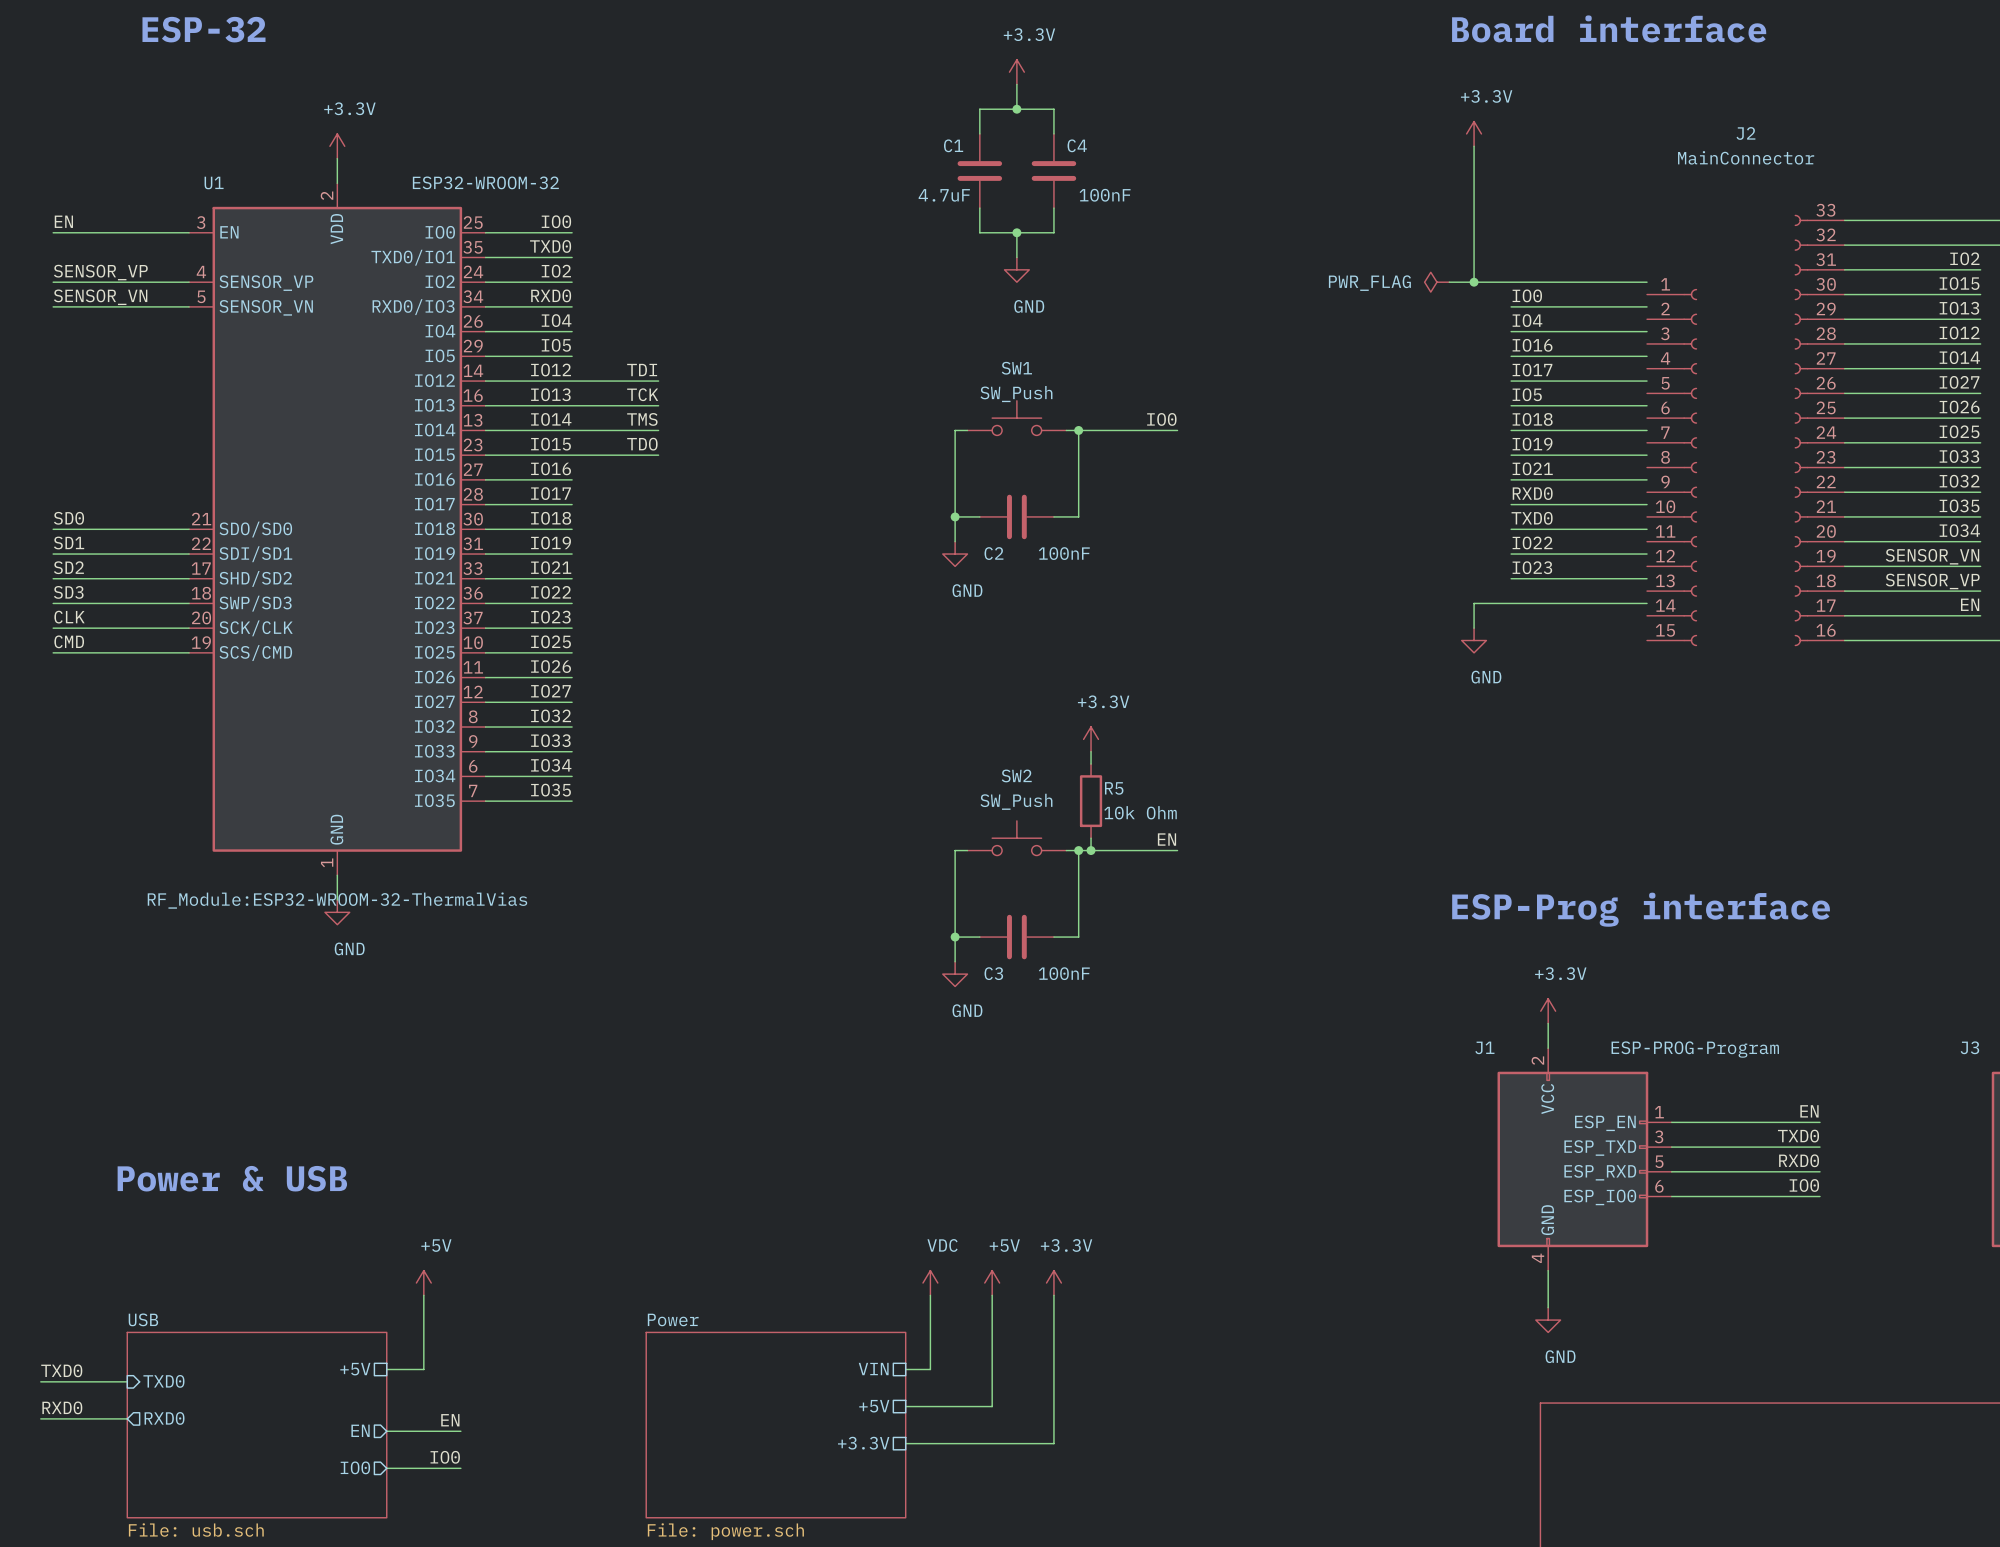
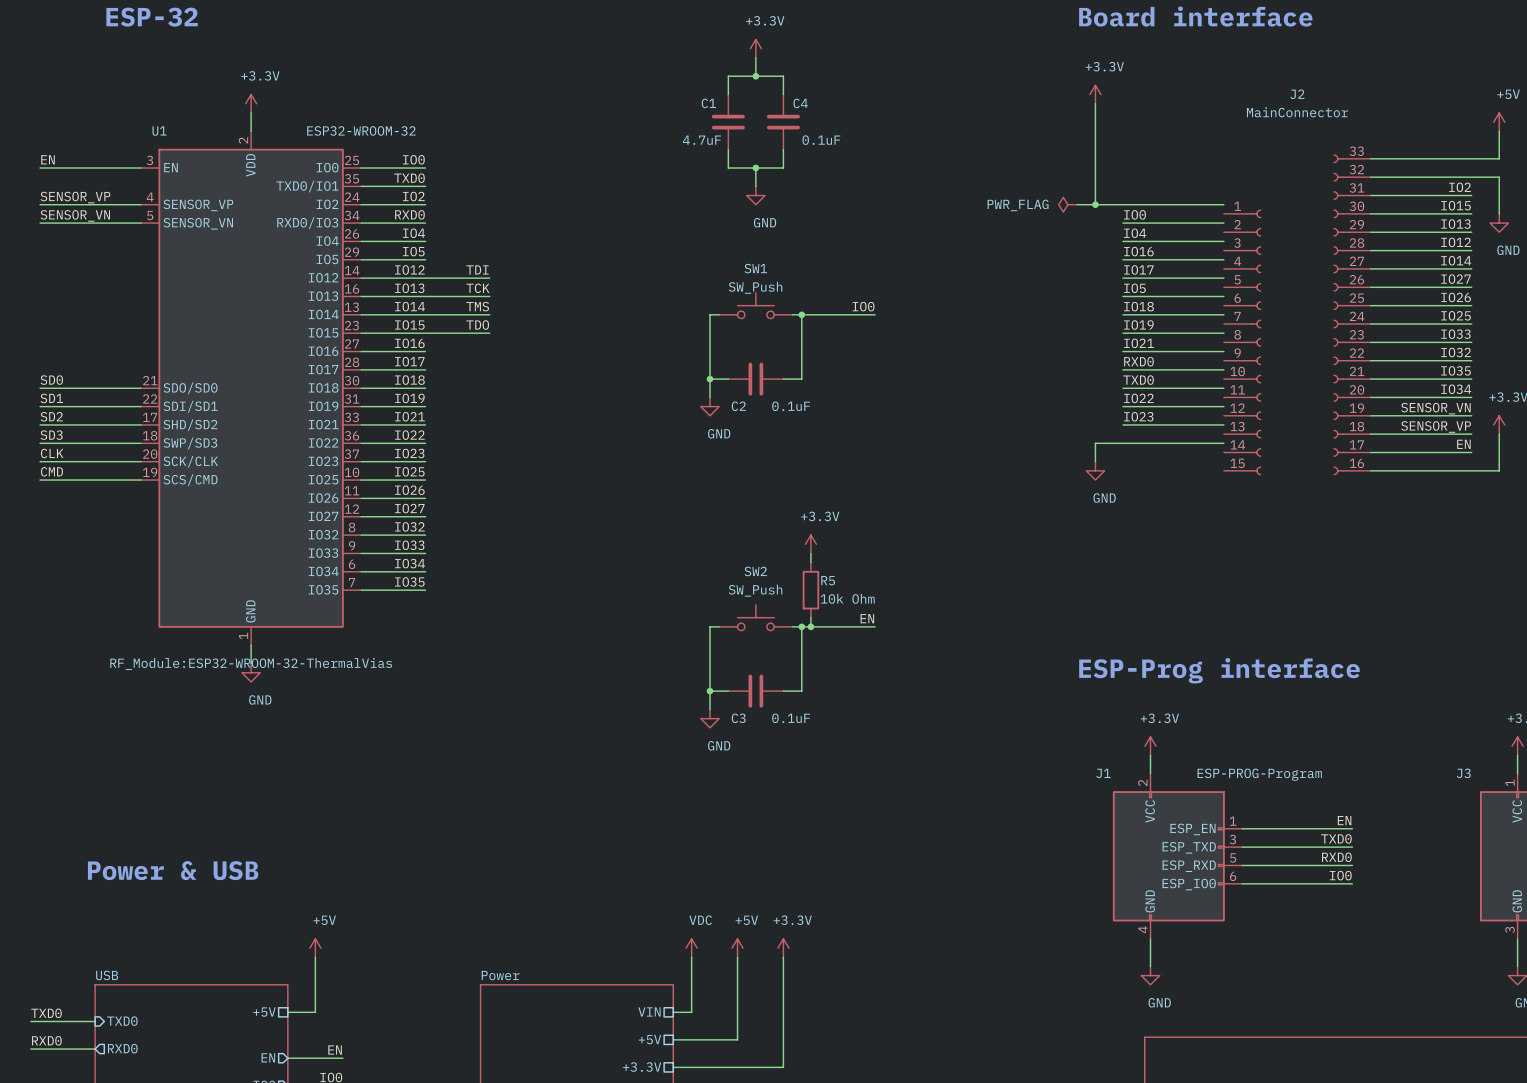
C4 value: 100nF (1105, 195) -> 0.1uF (821, 140)
C2 value: 100nF (1064, 553) -> 0.1uF (791, 406)
C3 value: 100nF (1064, 973) -> 0.1uF (791, 718)

